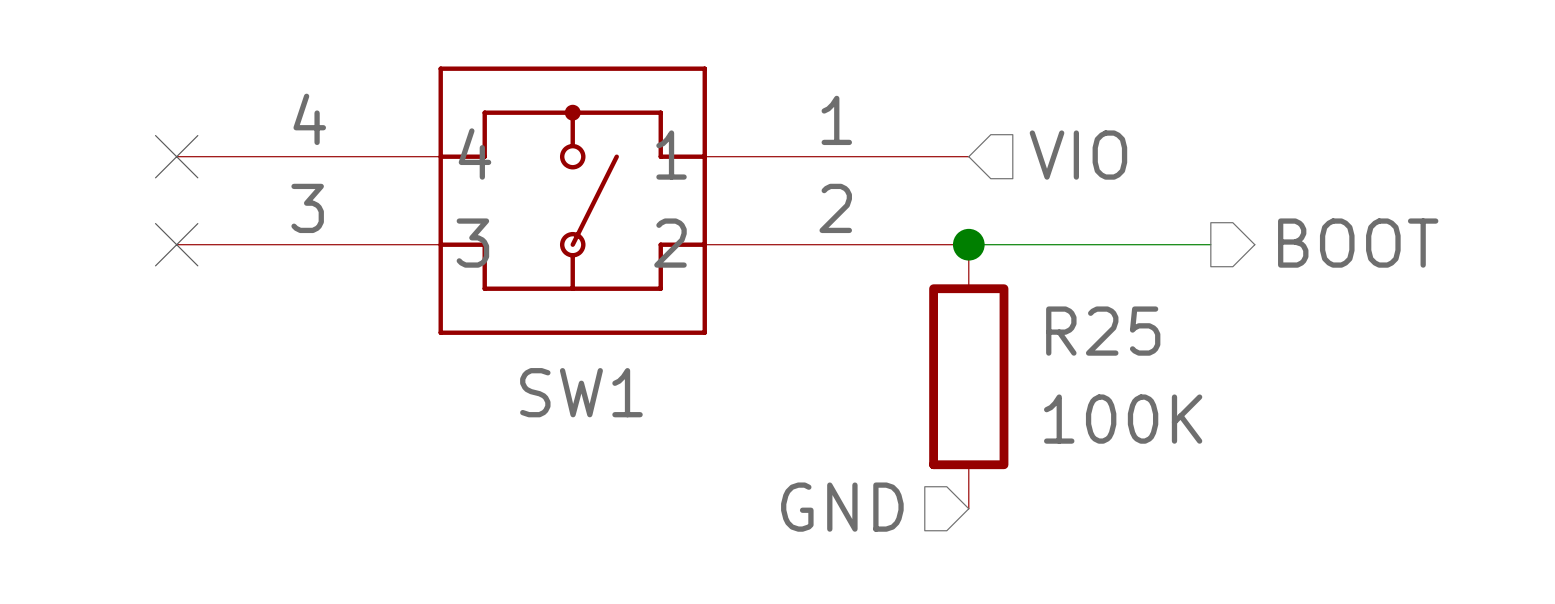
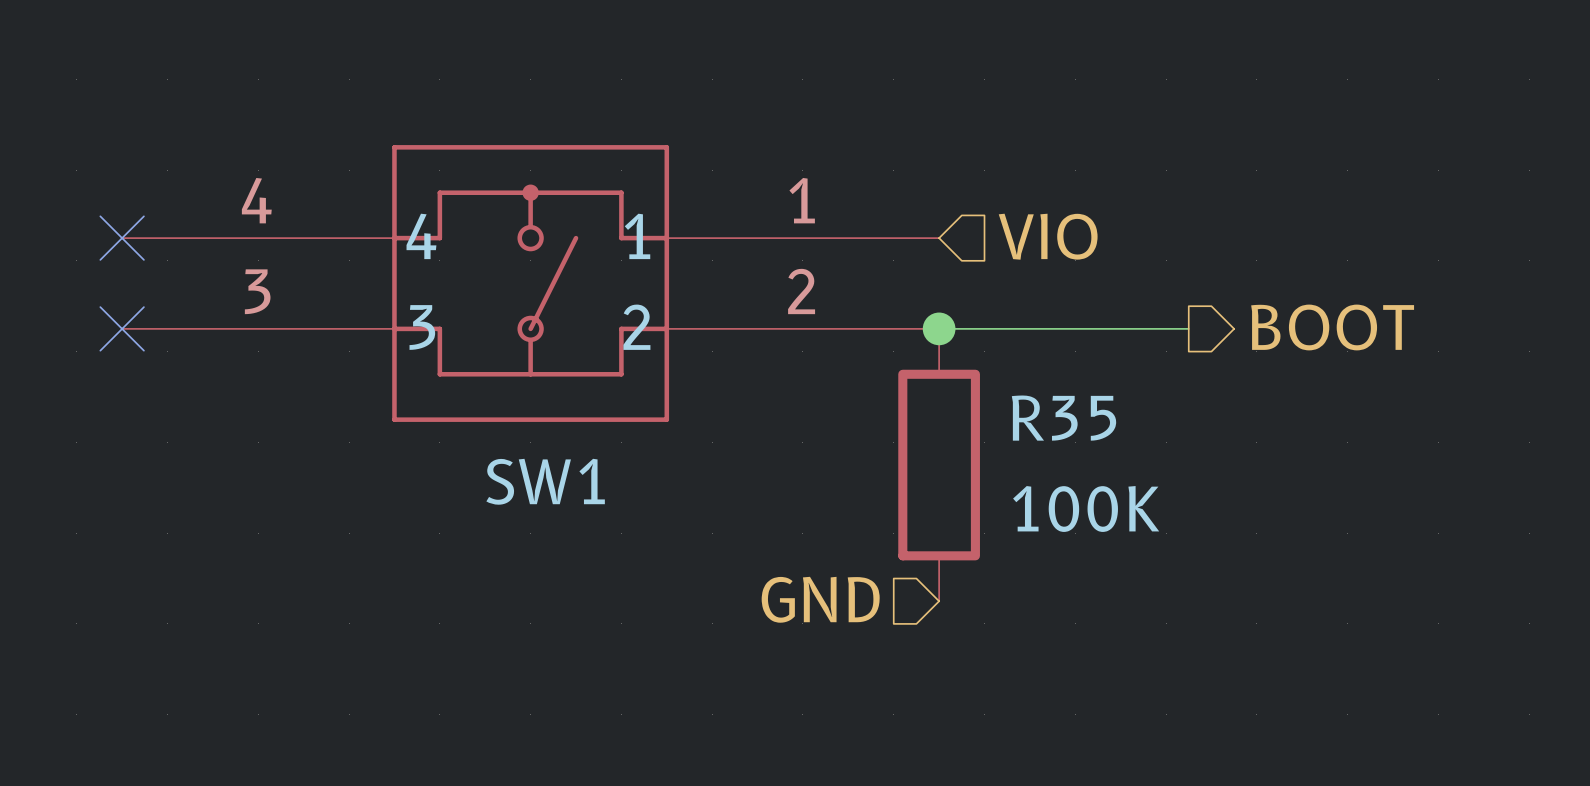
R25 name: R25 (1103, 331) -> R35 (1063, 418)

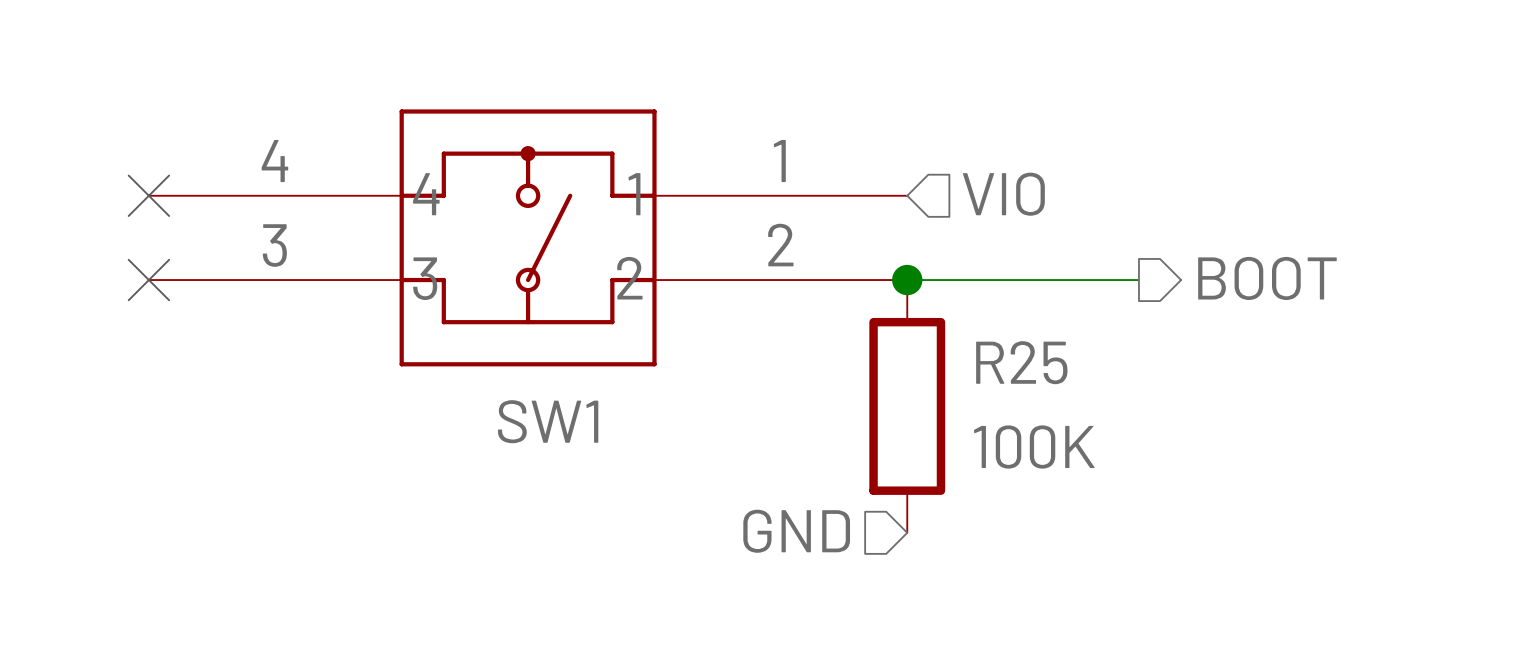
R35 name: R35 (1063, 418) -> R25 (1021, 362)

